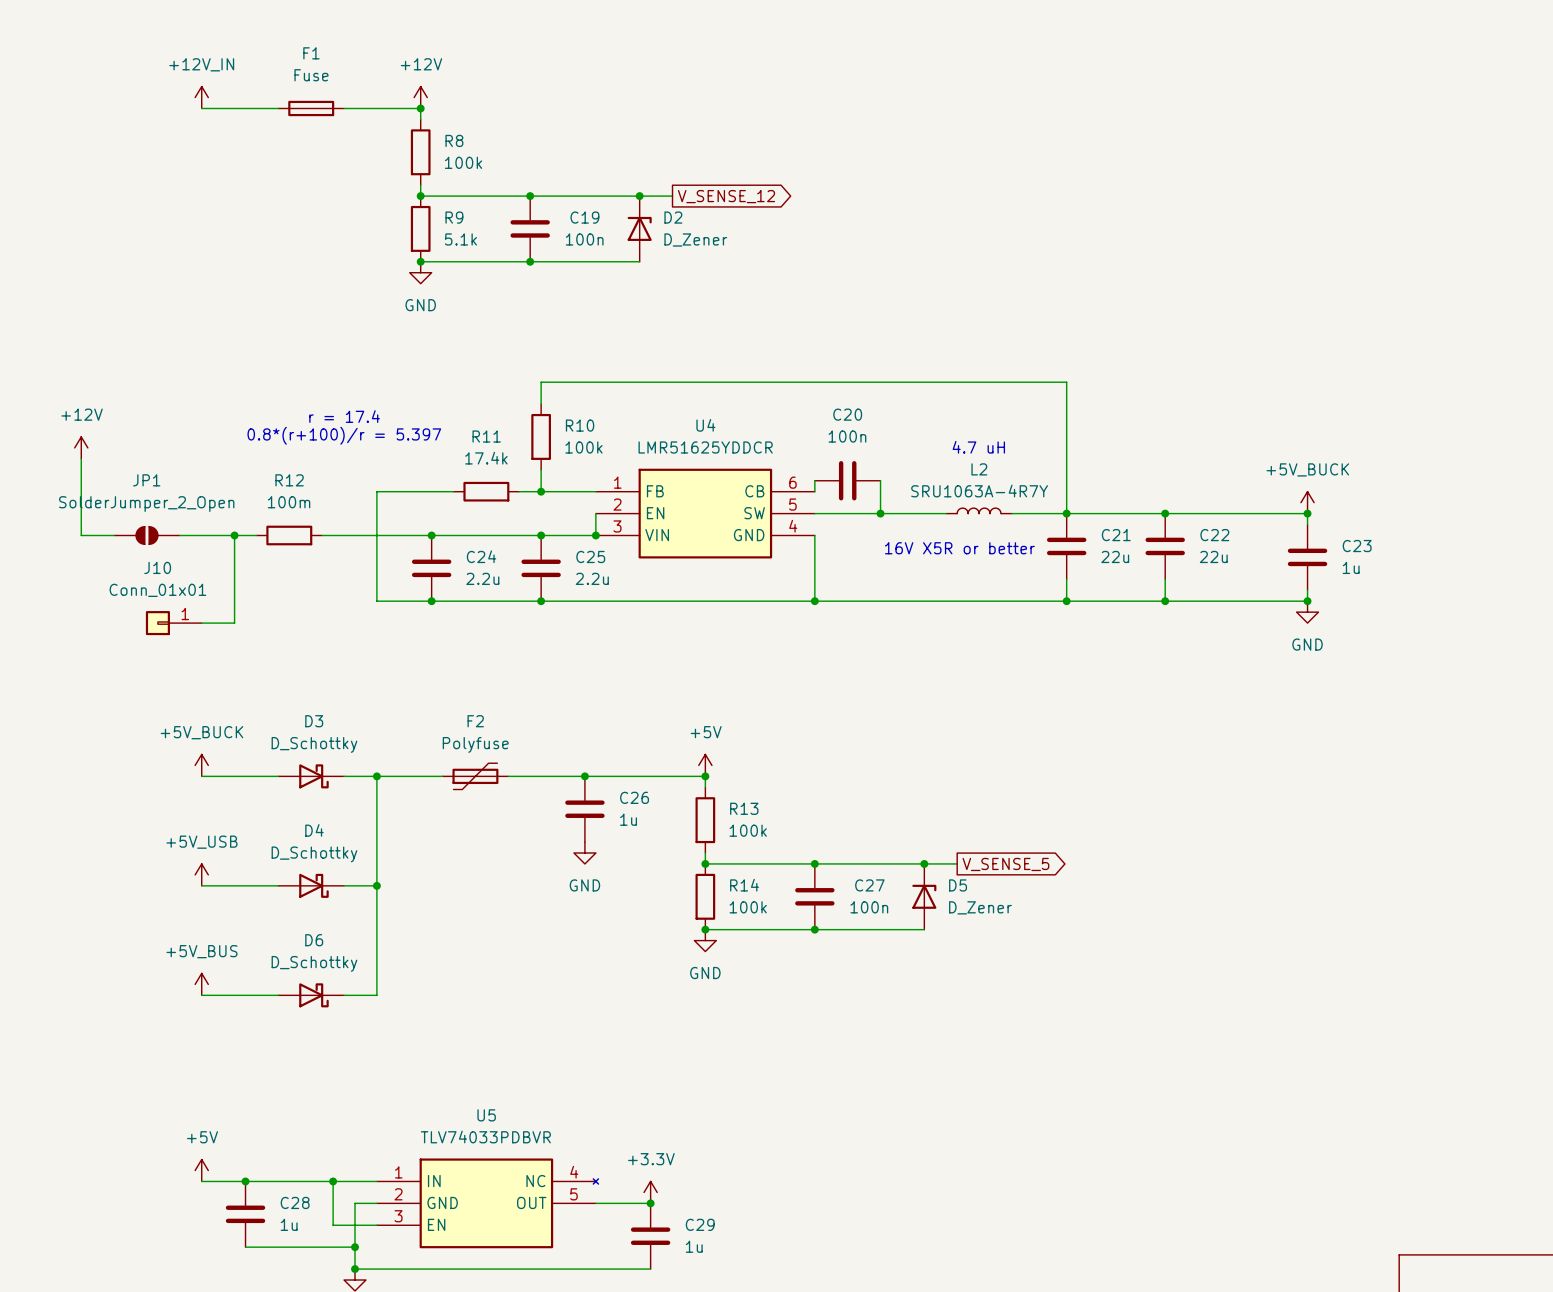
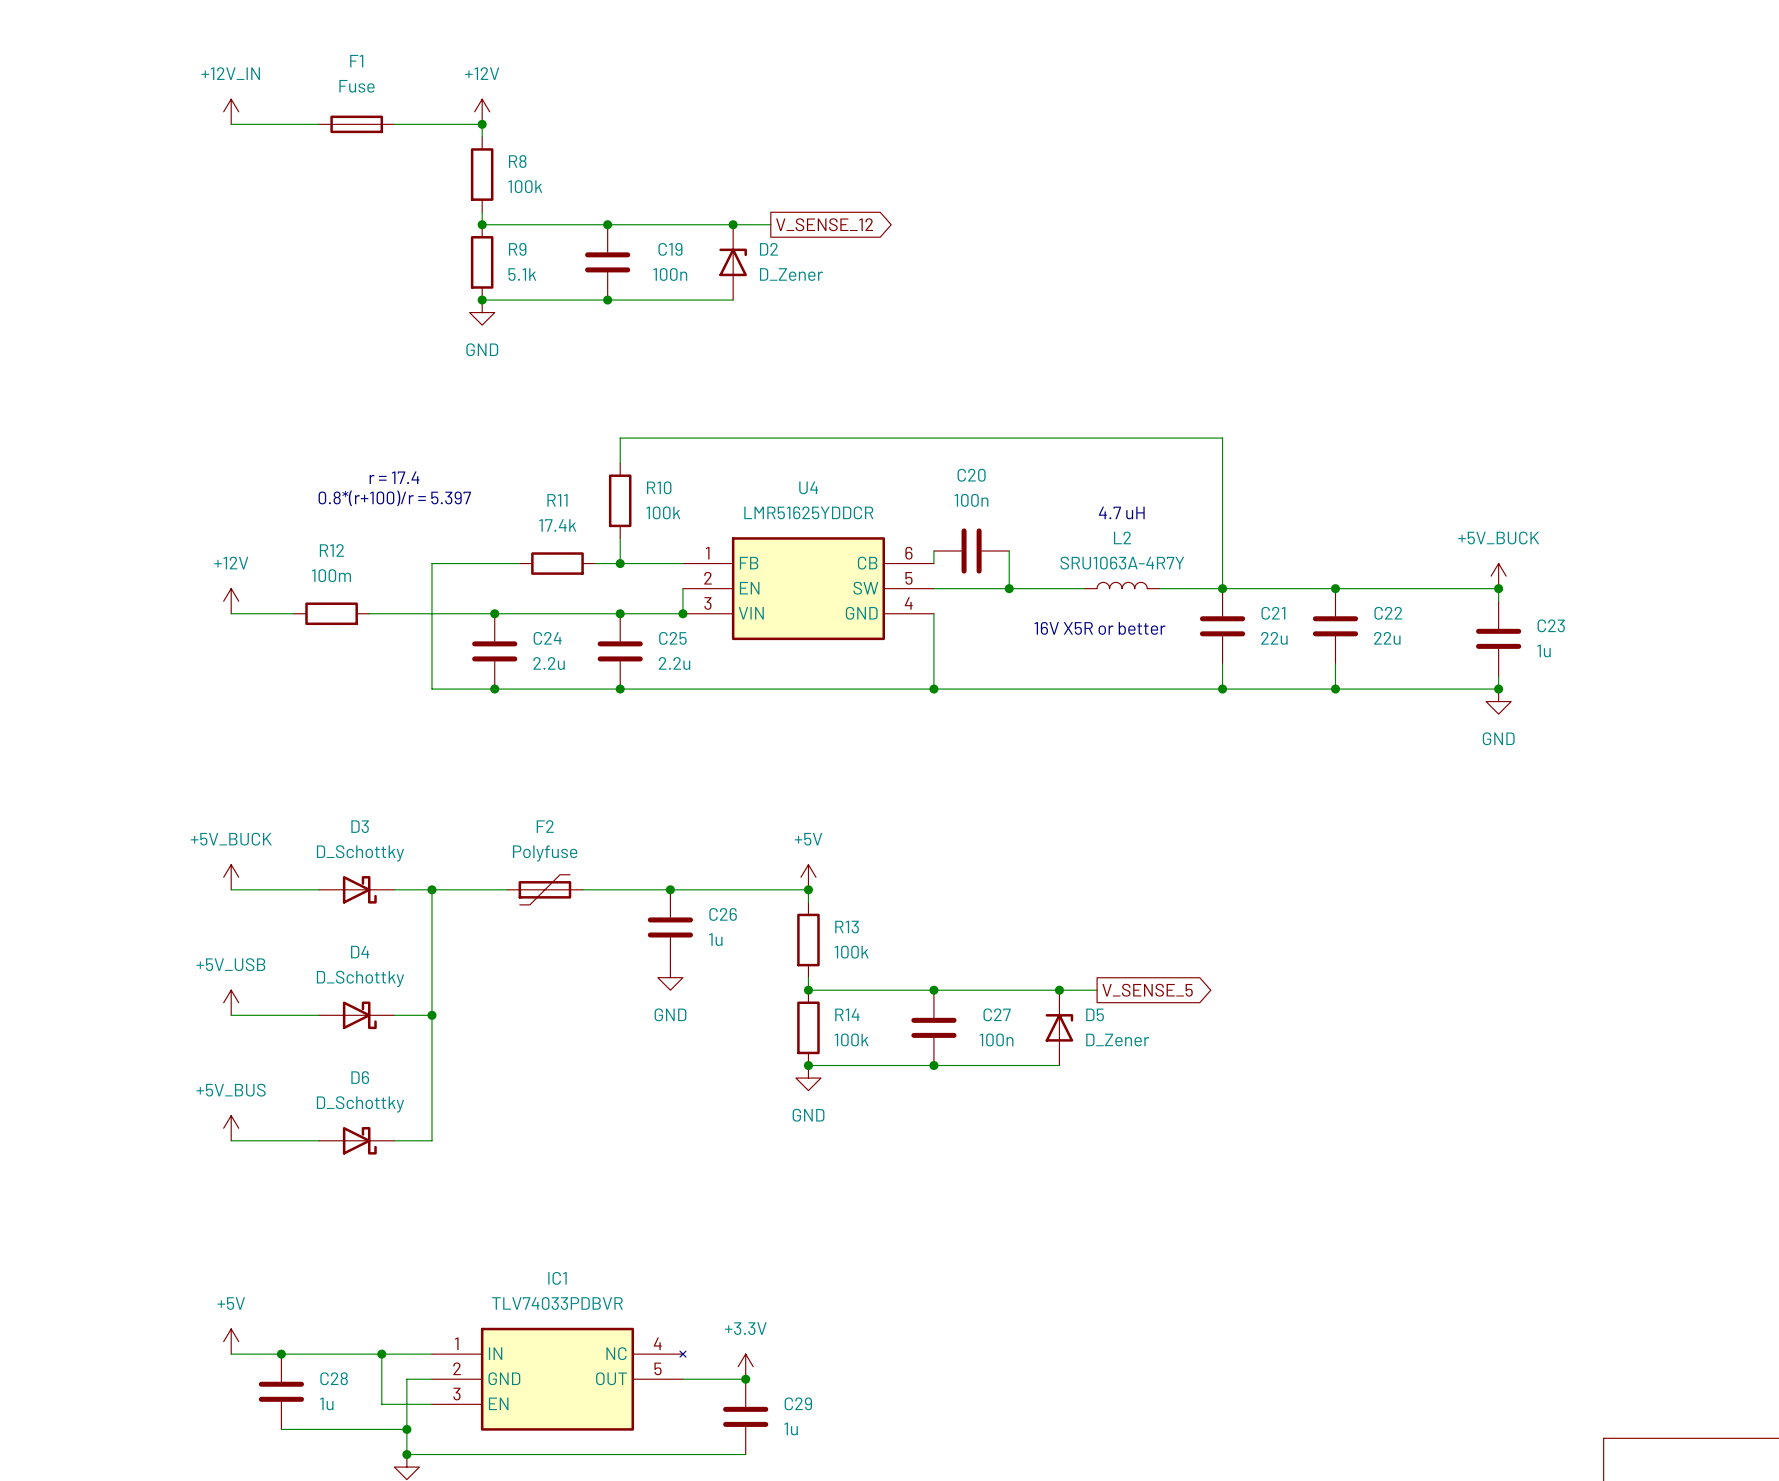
power symbol position: +12V (81, 447) -> +12V (231, 601)
wire: (81, 458) (81, 535) (114, 535) -> none
JP1: SolderJumper_2_Open (146, 535) -> none
wire: (179, 535) (201, 535) -> none
wire: (234, 535) (234, 623) (201, 623) -> none
junction: (234, 535) -> none
J10: Conn_01x01 (173, 623) -> none
U5 name: U5 (486, 1115) -> IC1 (557, 1278)

